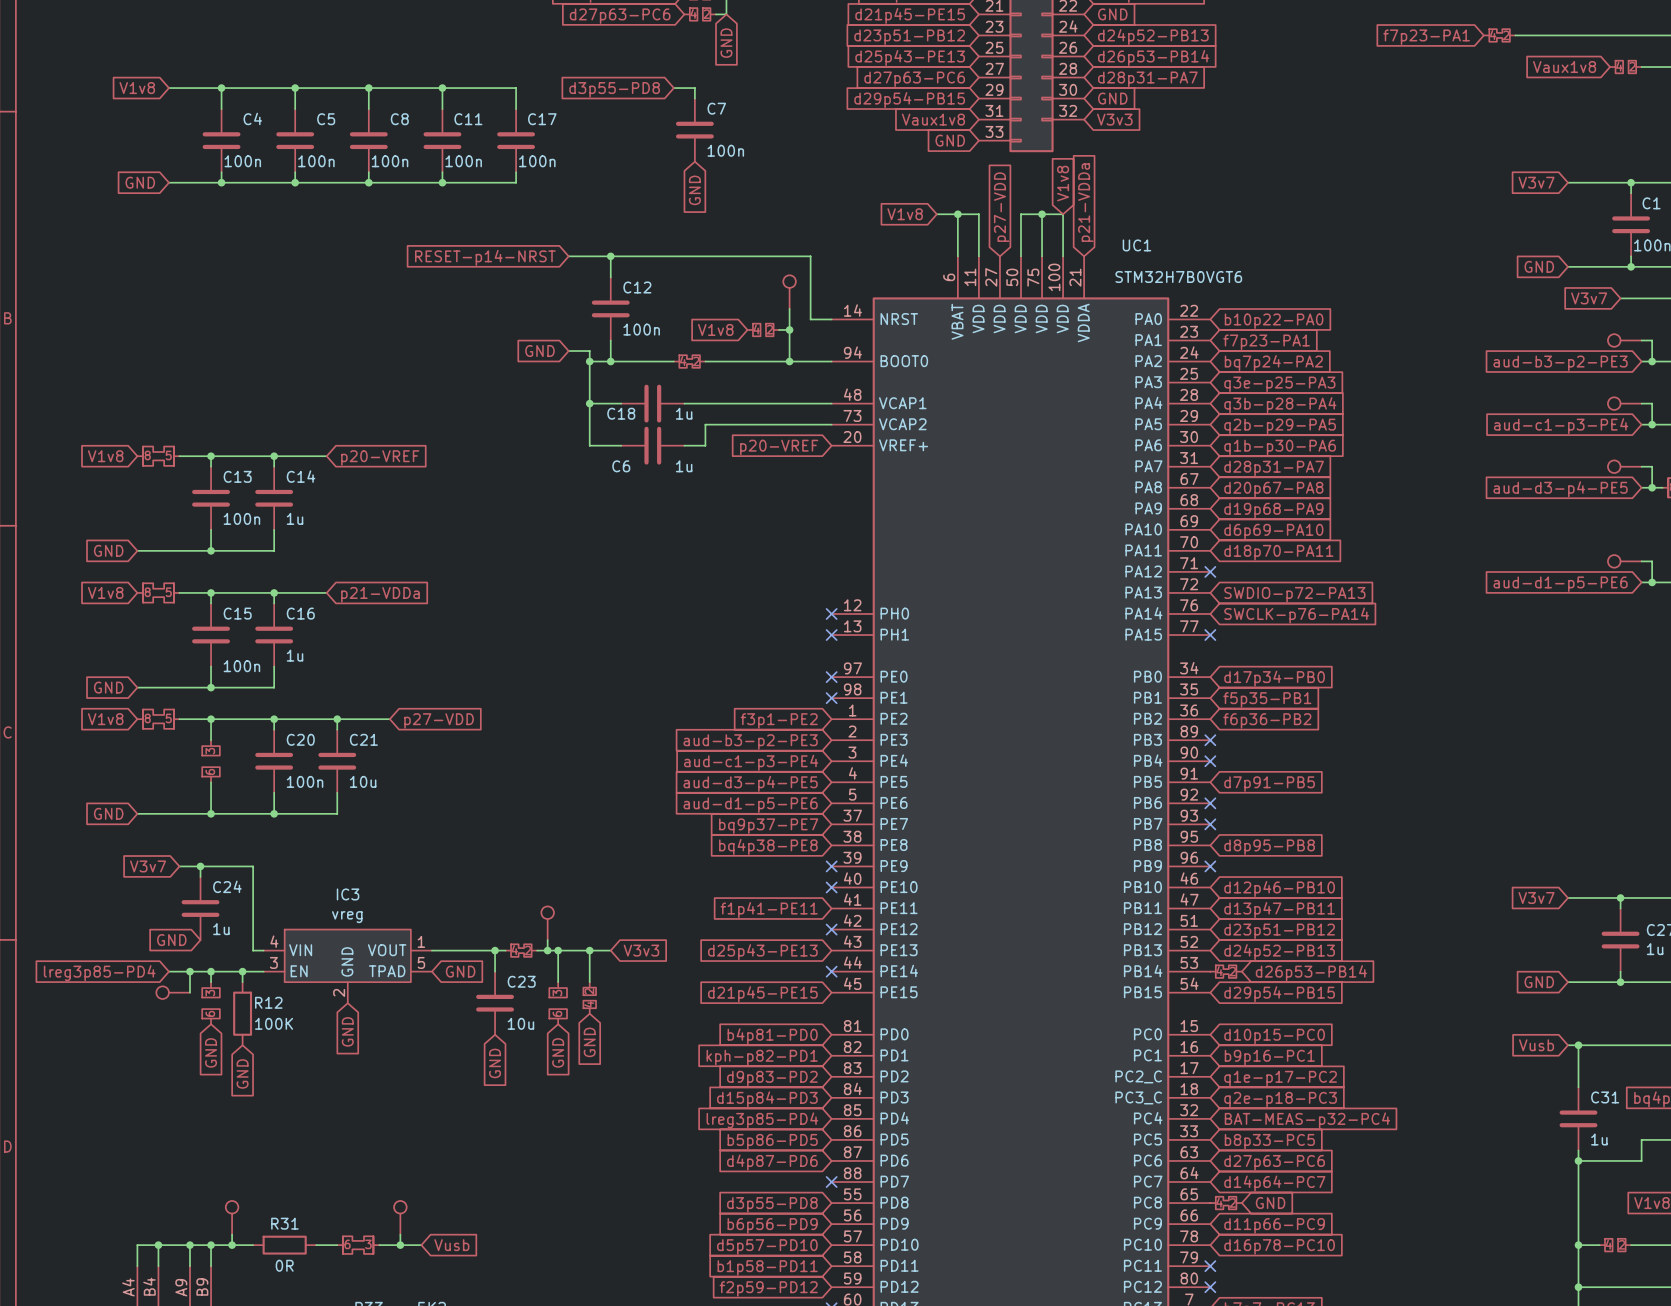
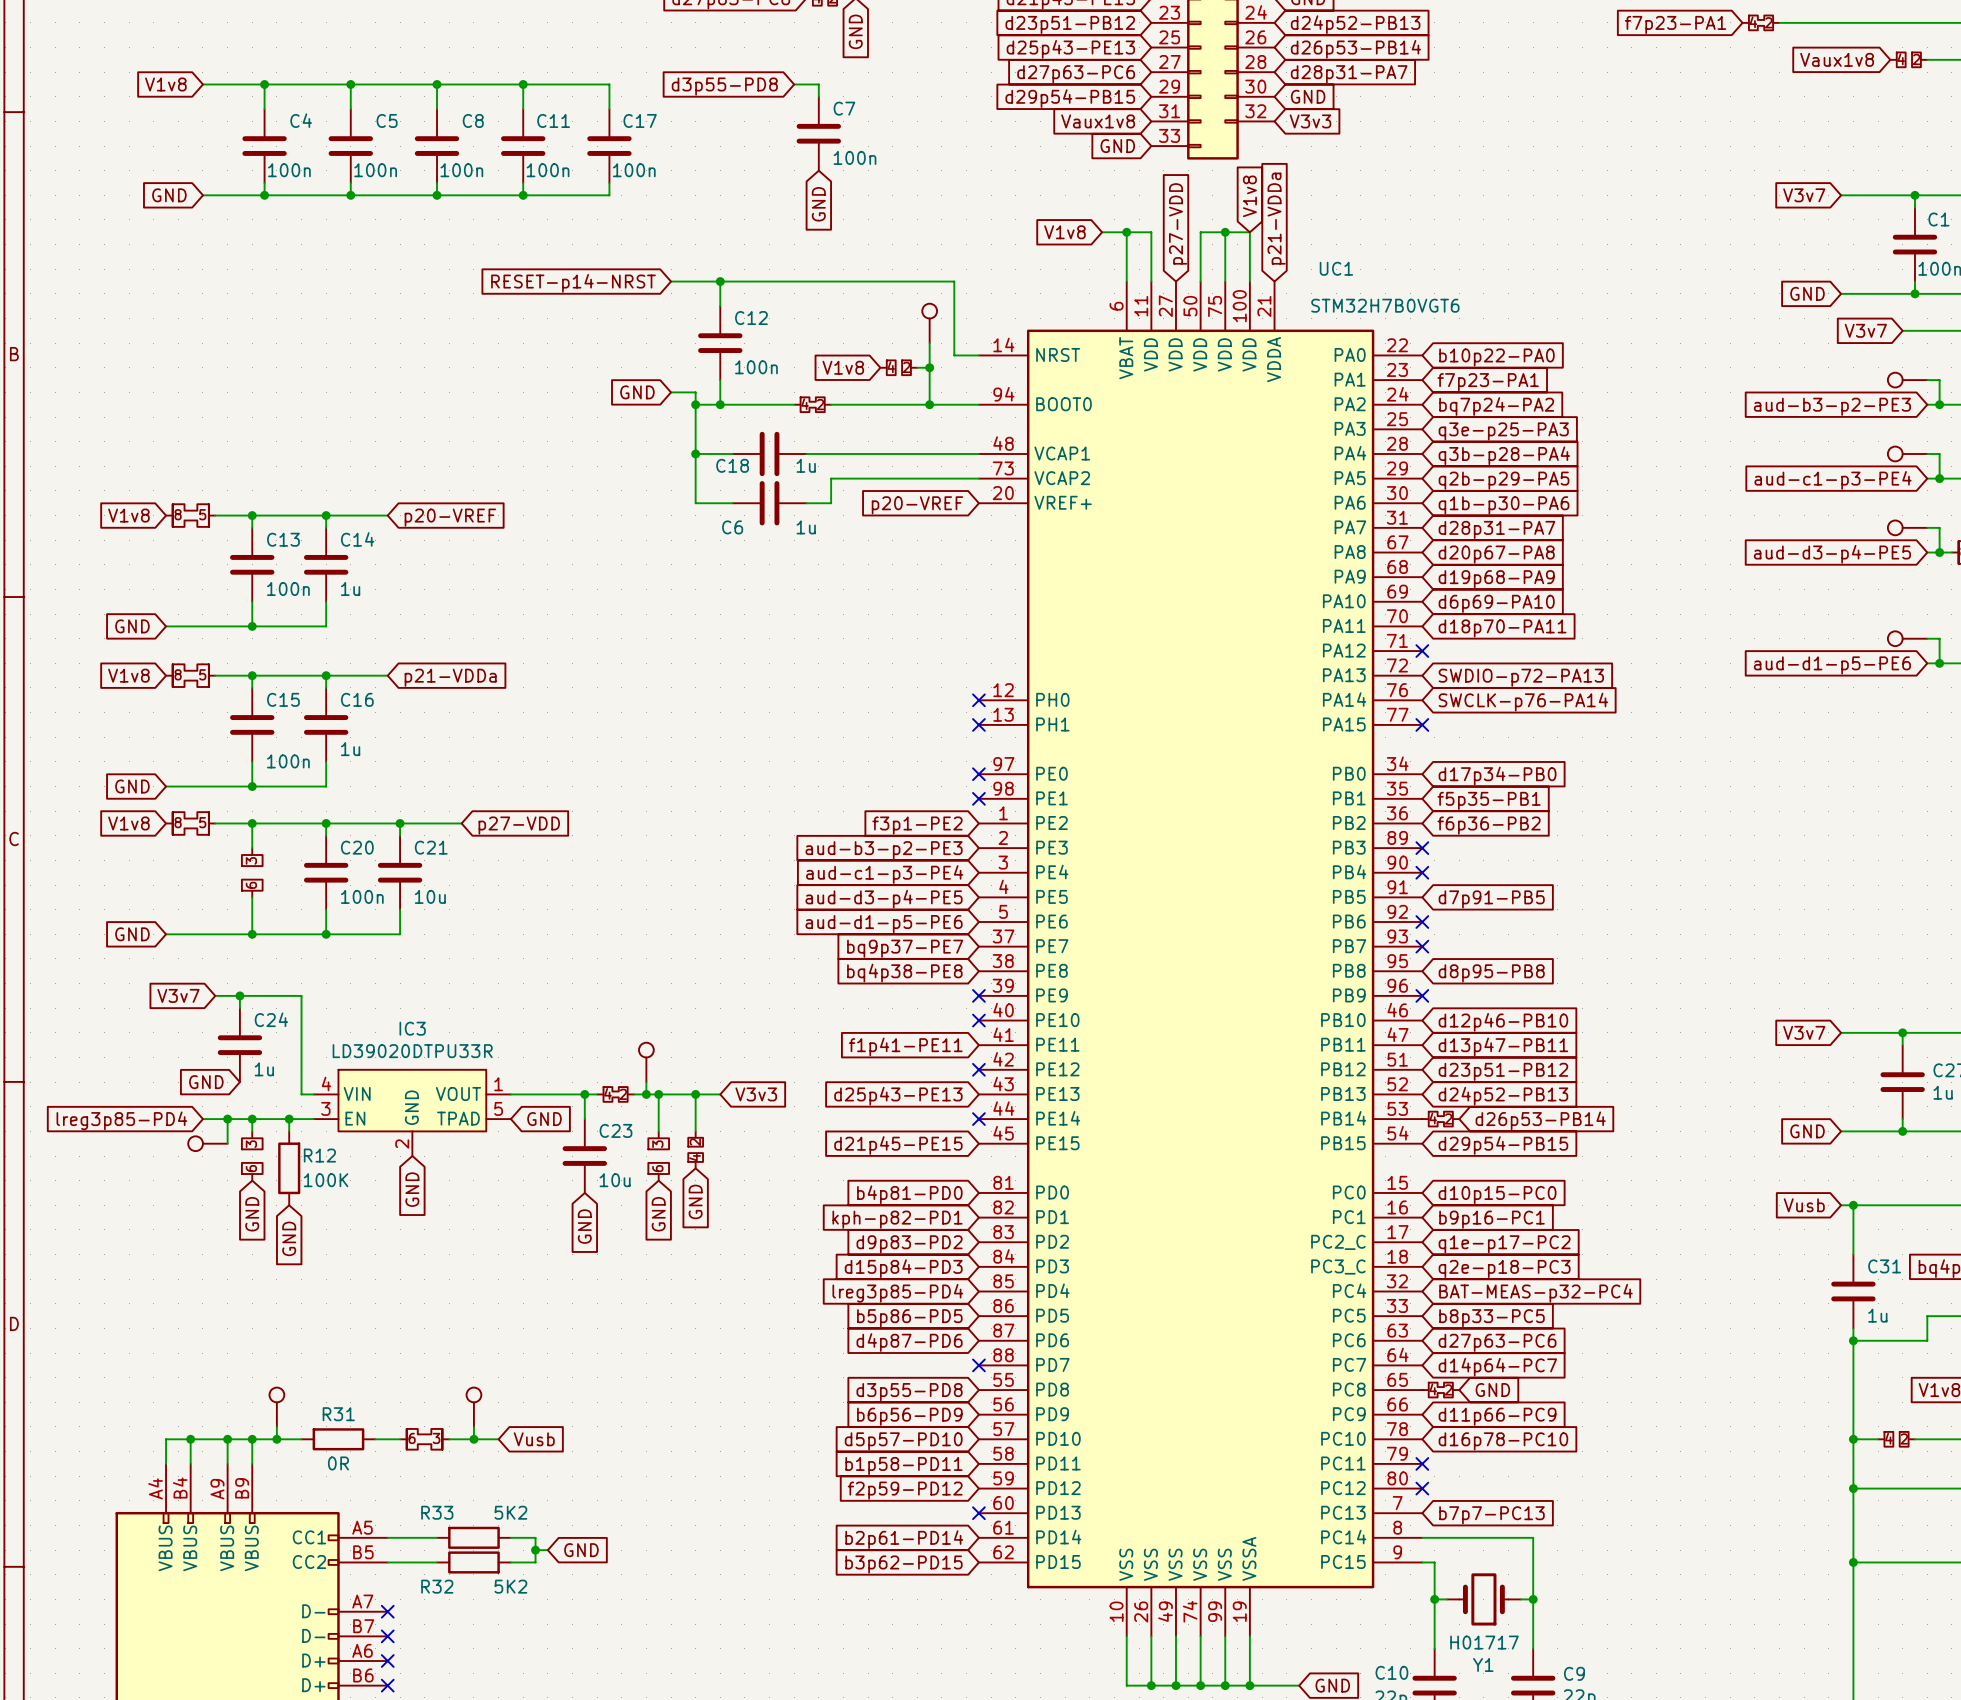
IC3 value: vreg (347, 917) -> LD39020DTPU33R (412, 1051)

